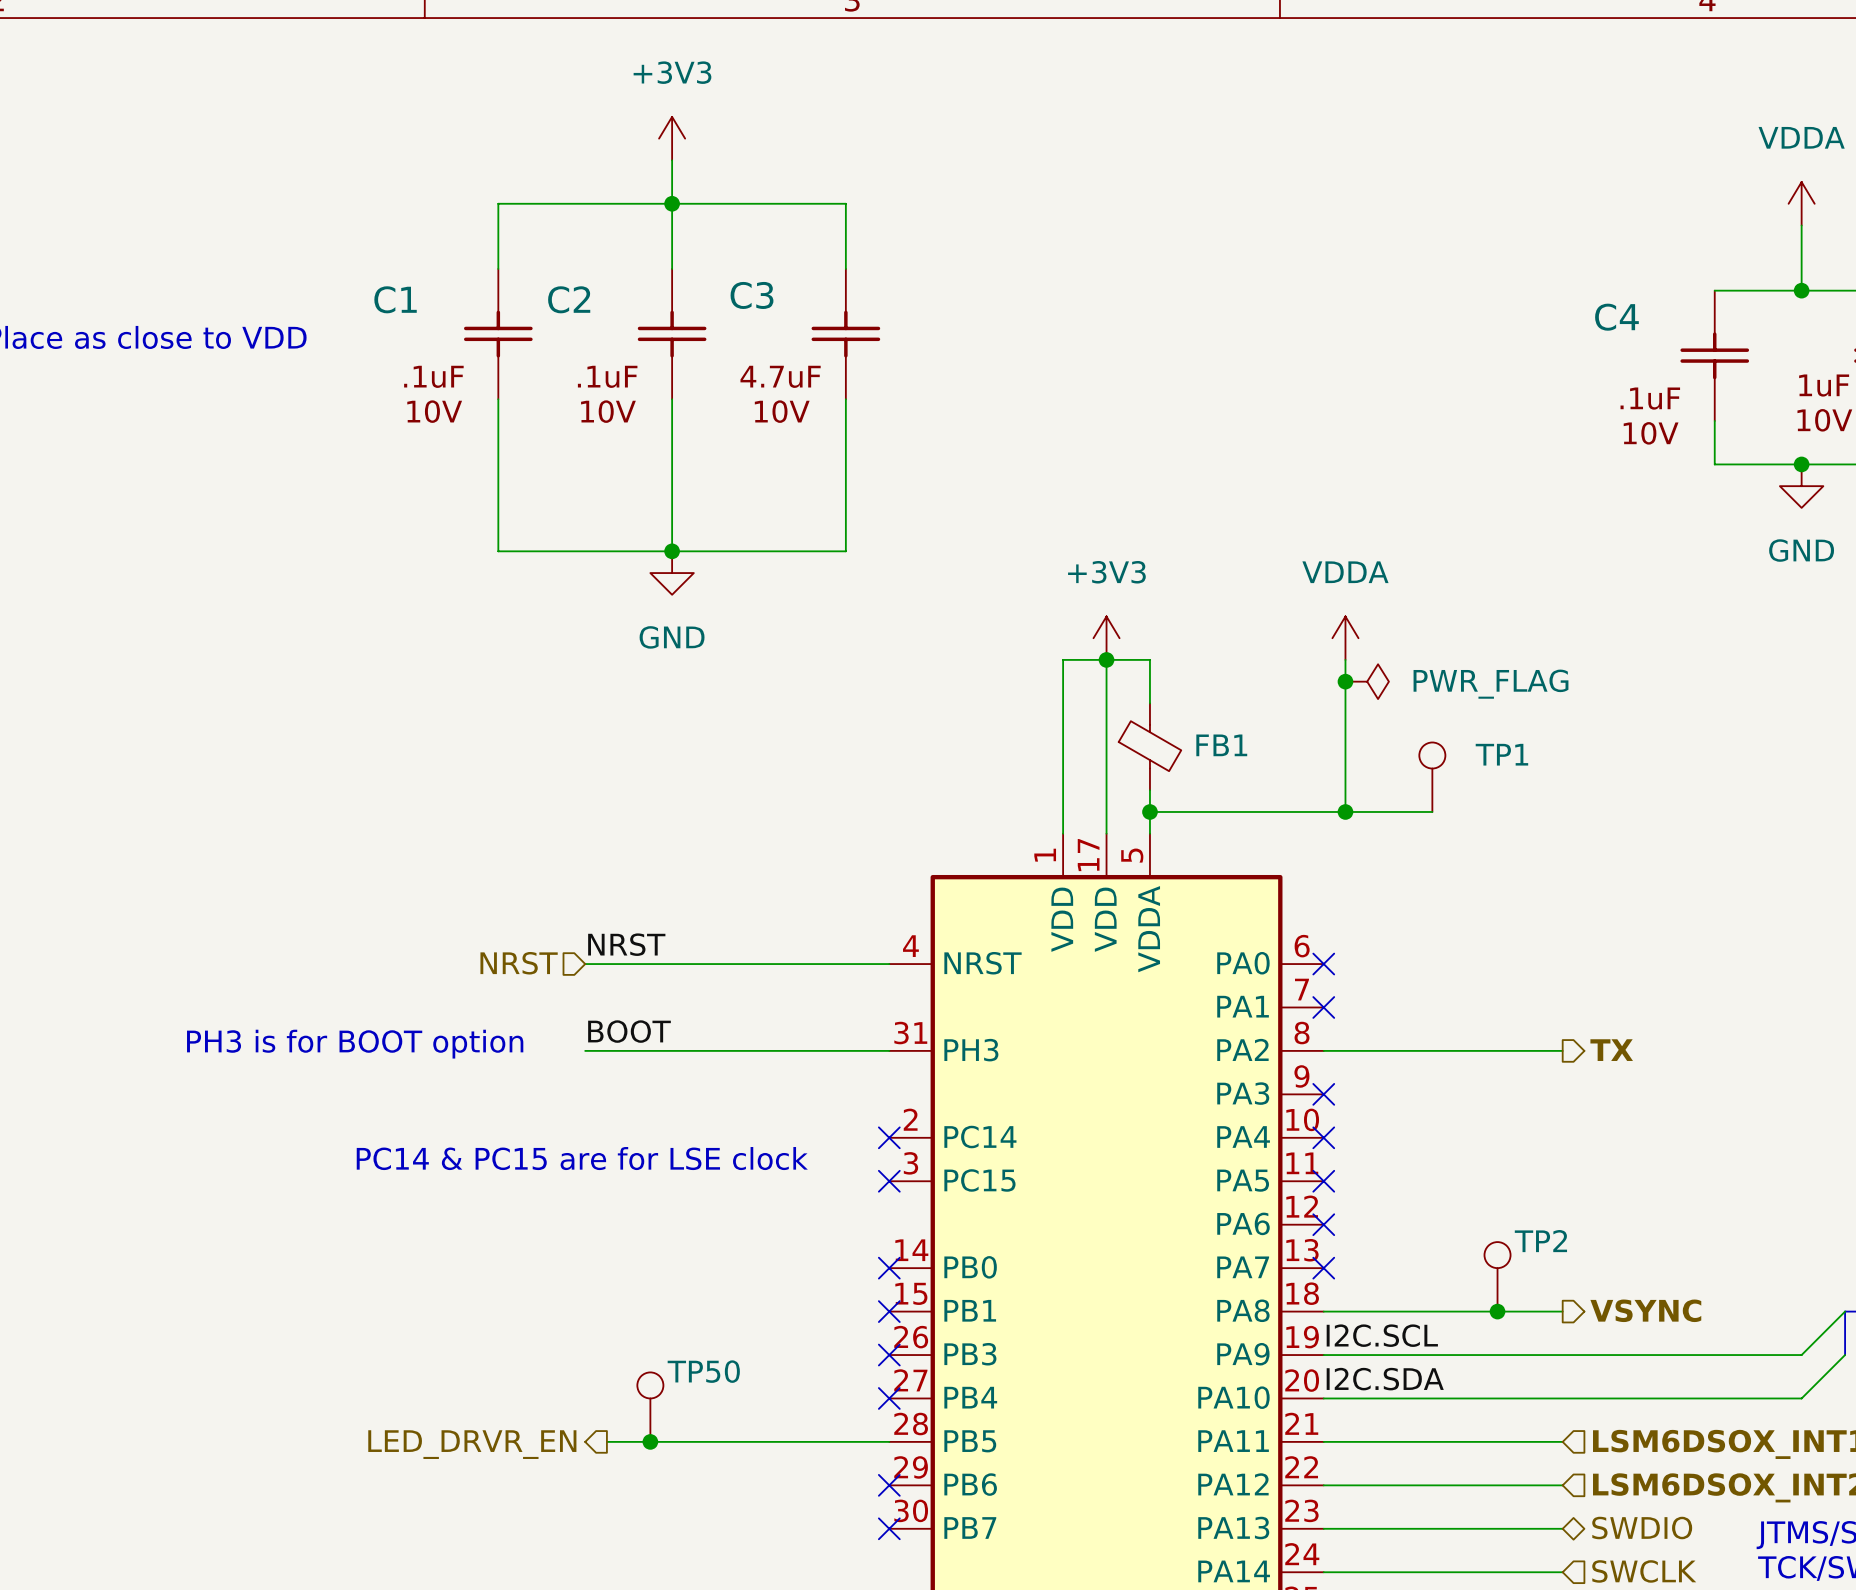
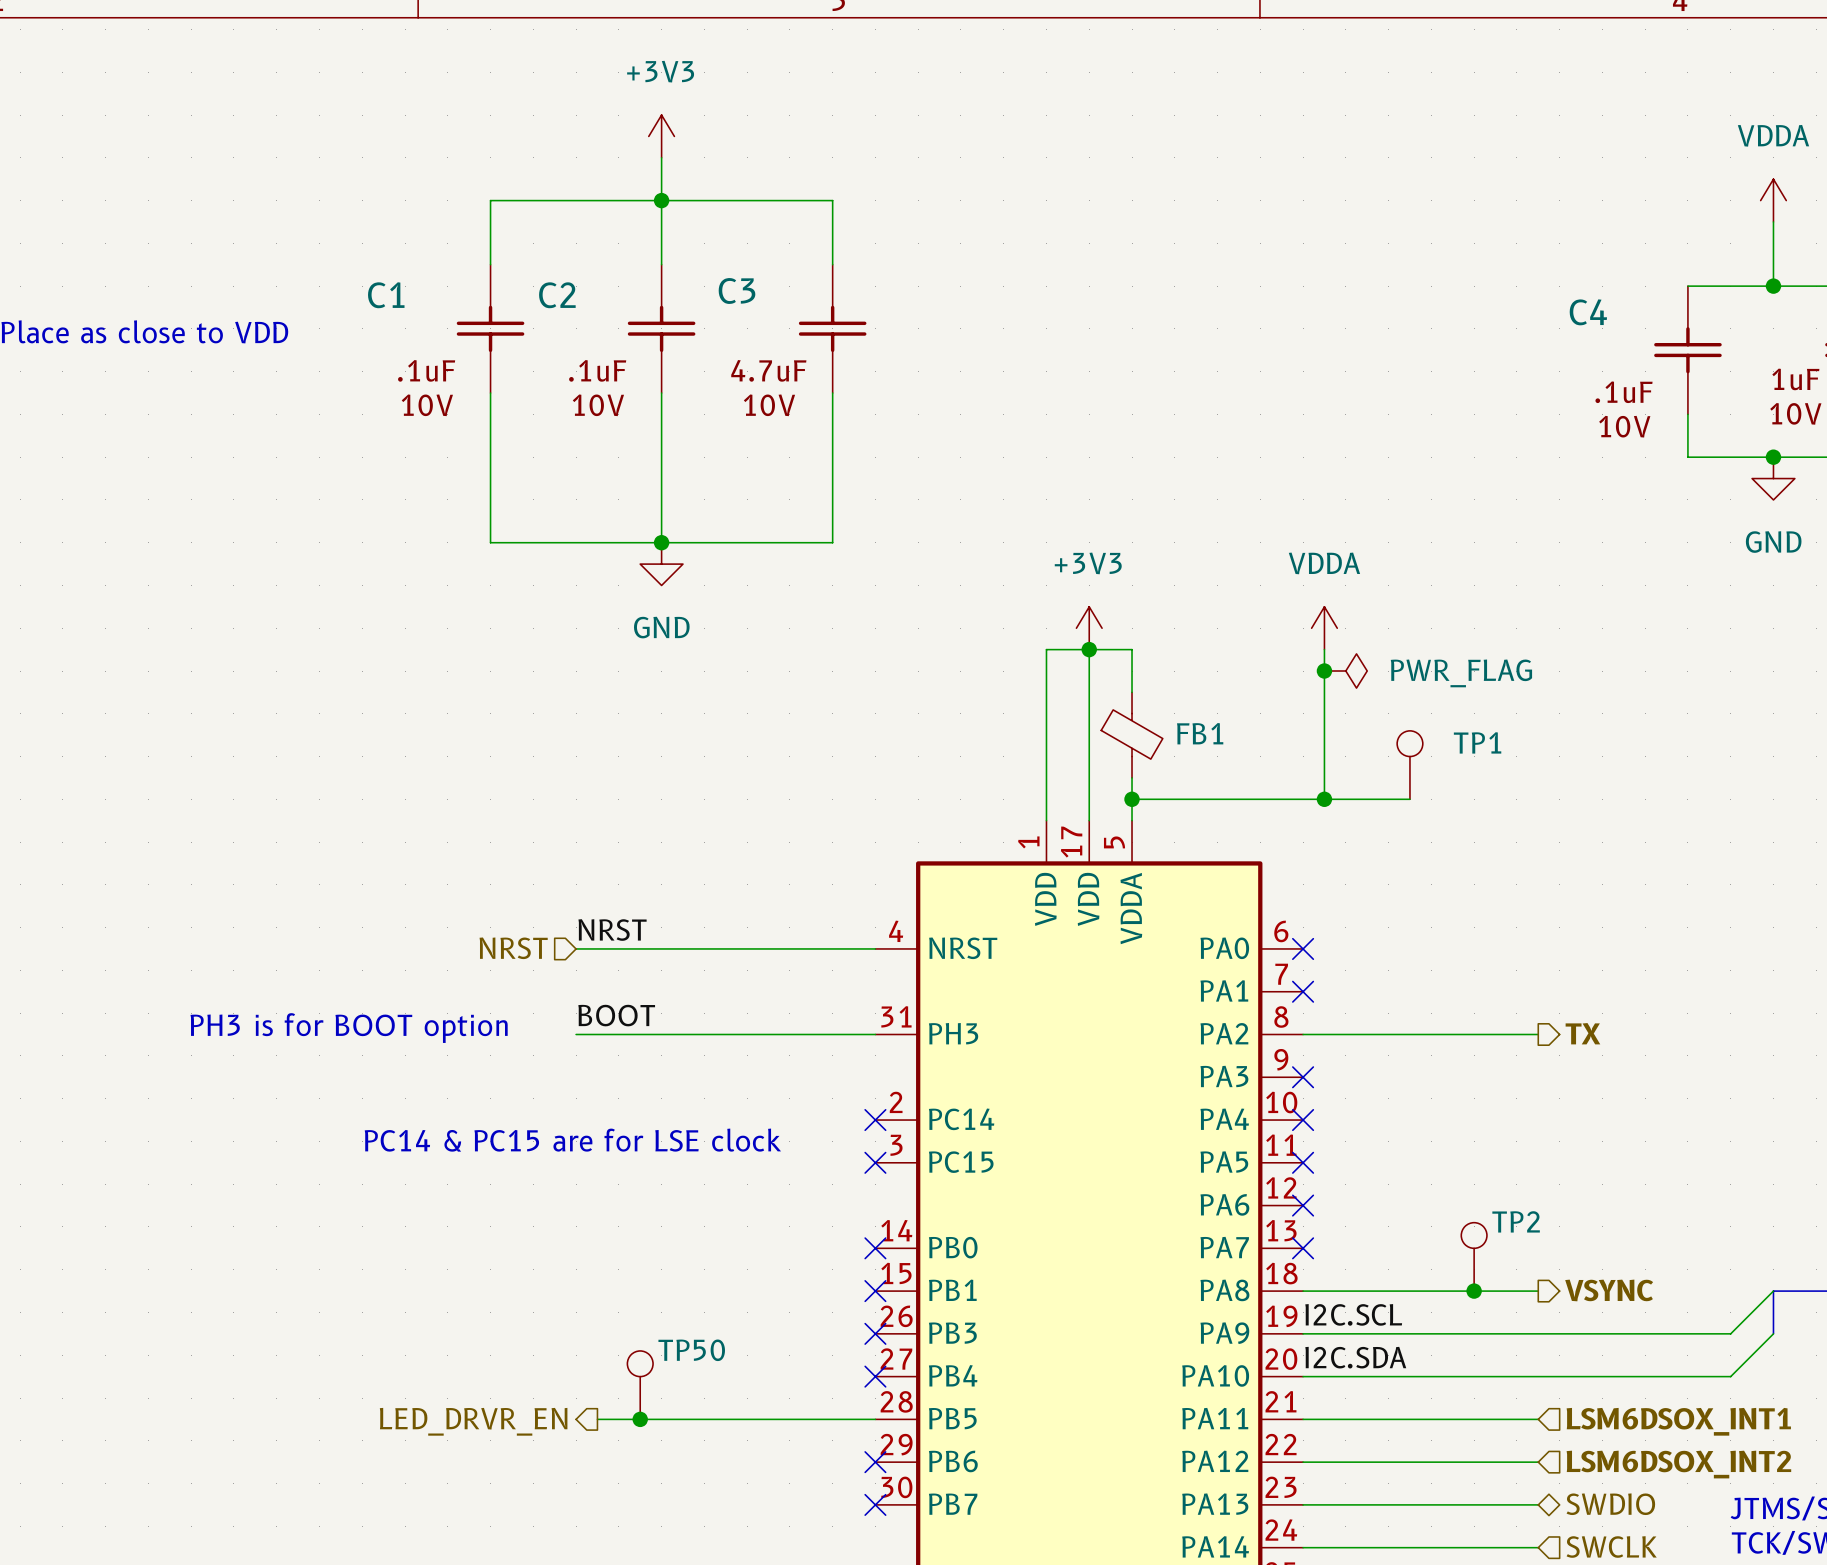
wire: (1845, 1311) (1801, 1355) (1758, 1355) -> (1773, 1291) (1730, 1333)
bus: (1845, 1311) (1845, 1355) -> (1816, 1291) (1773, 1291) (1773, 1333)
wire: (1845, 1355) (1801, 1398) (1758, 1398) -> (1773, 1333) (1730, 1376)

